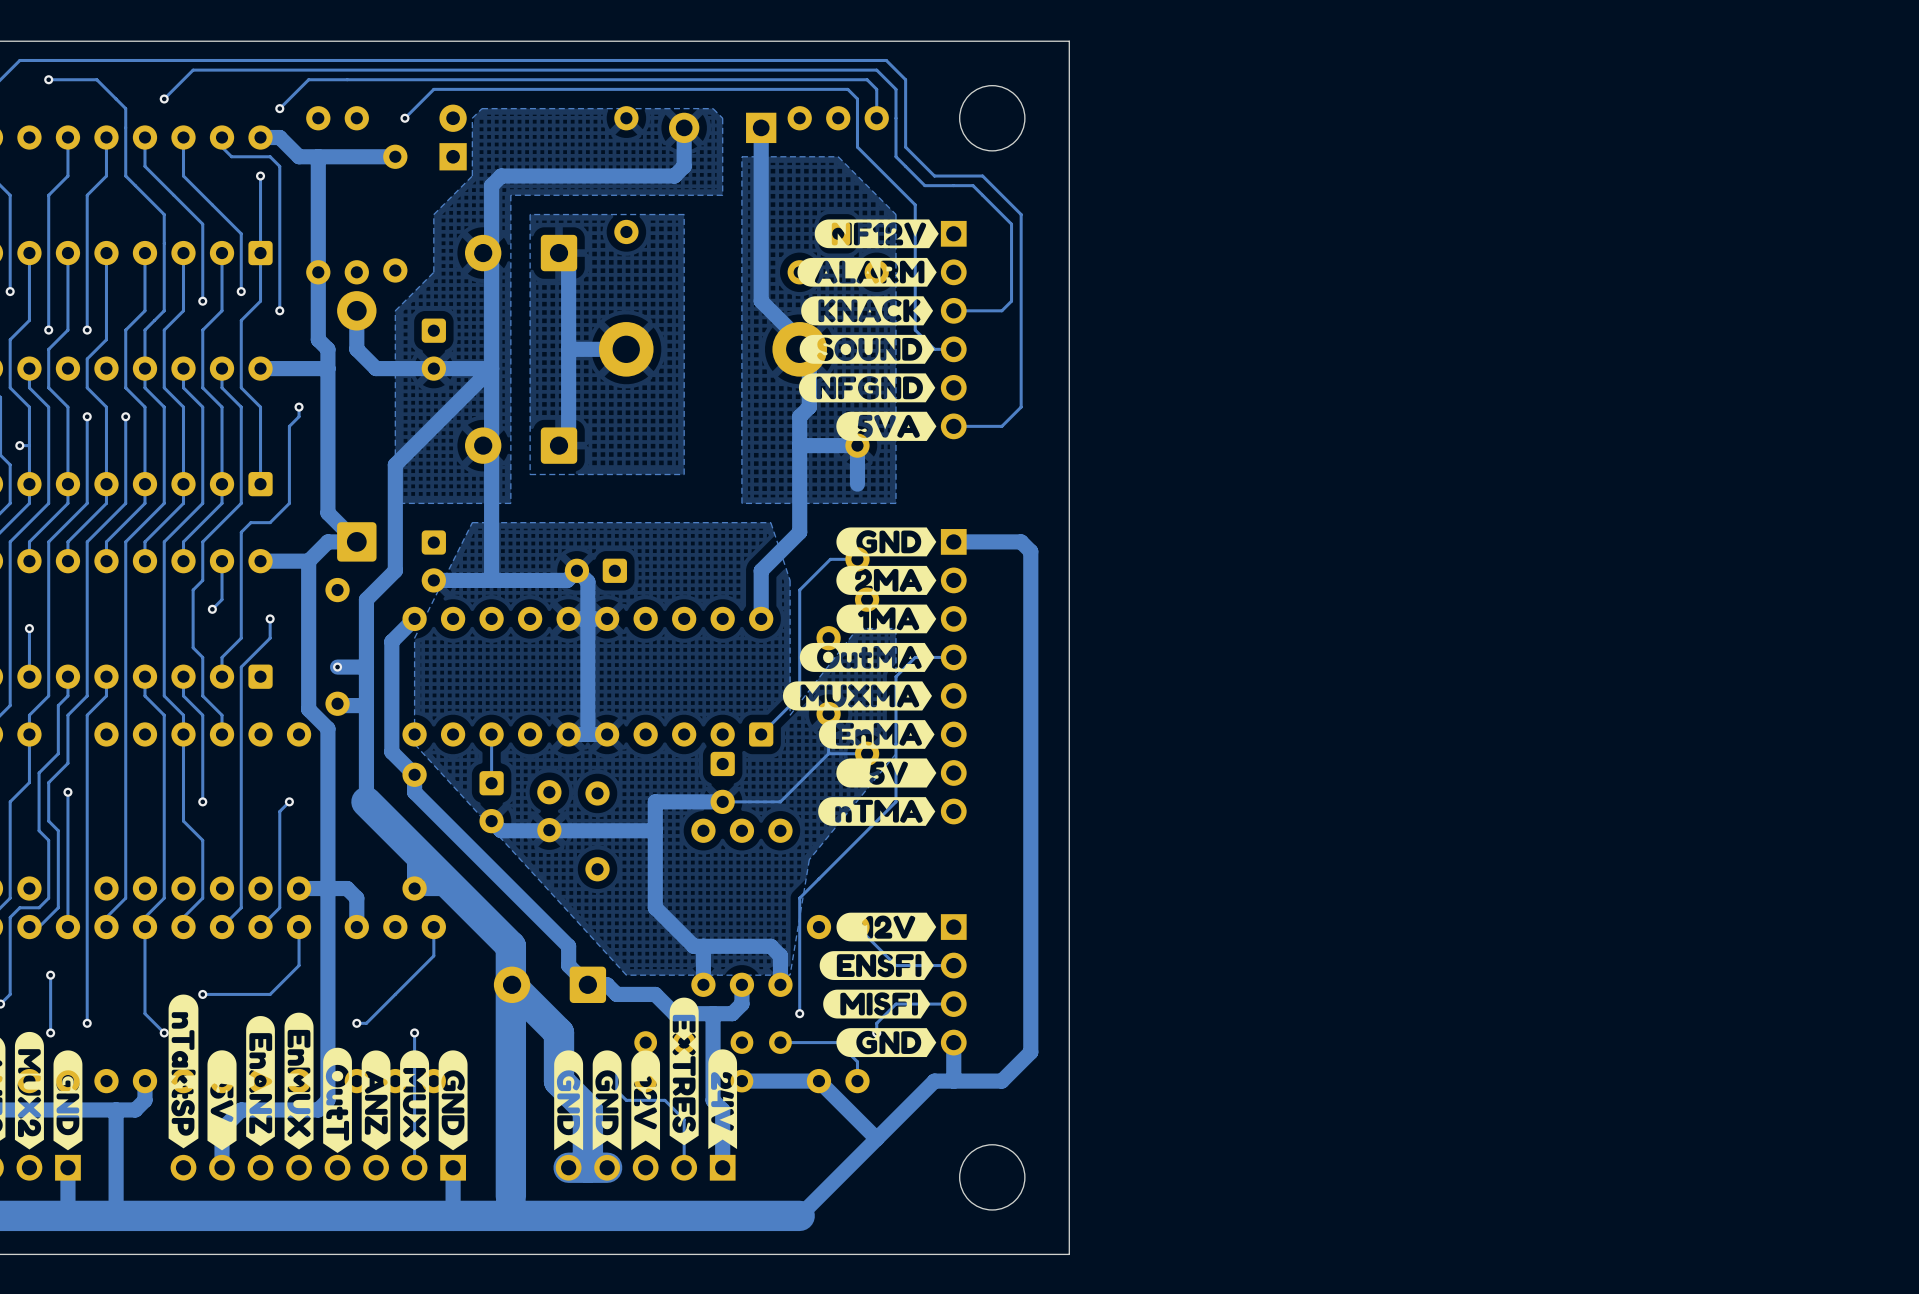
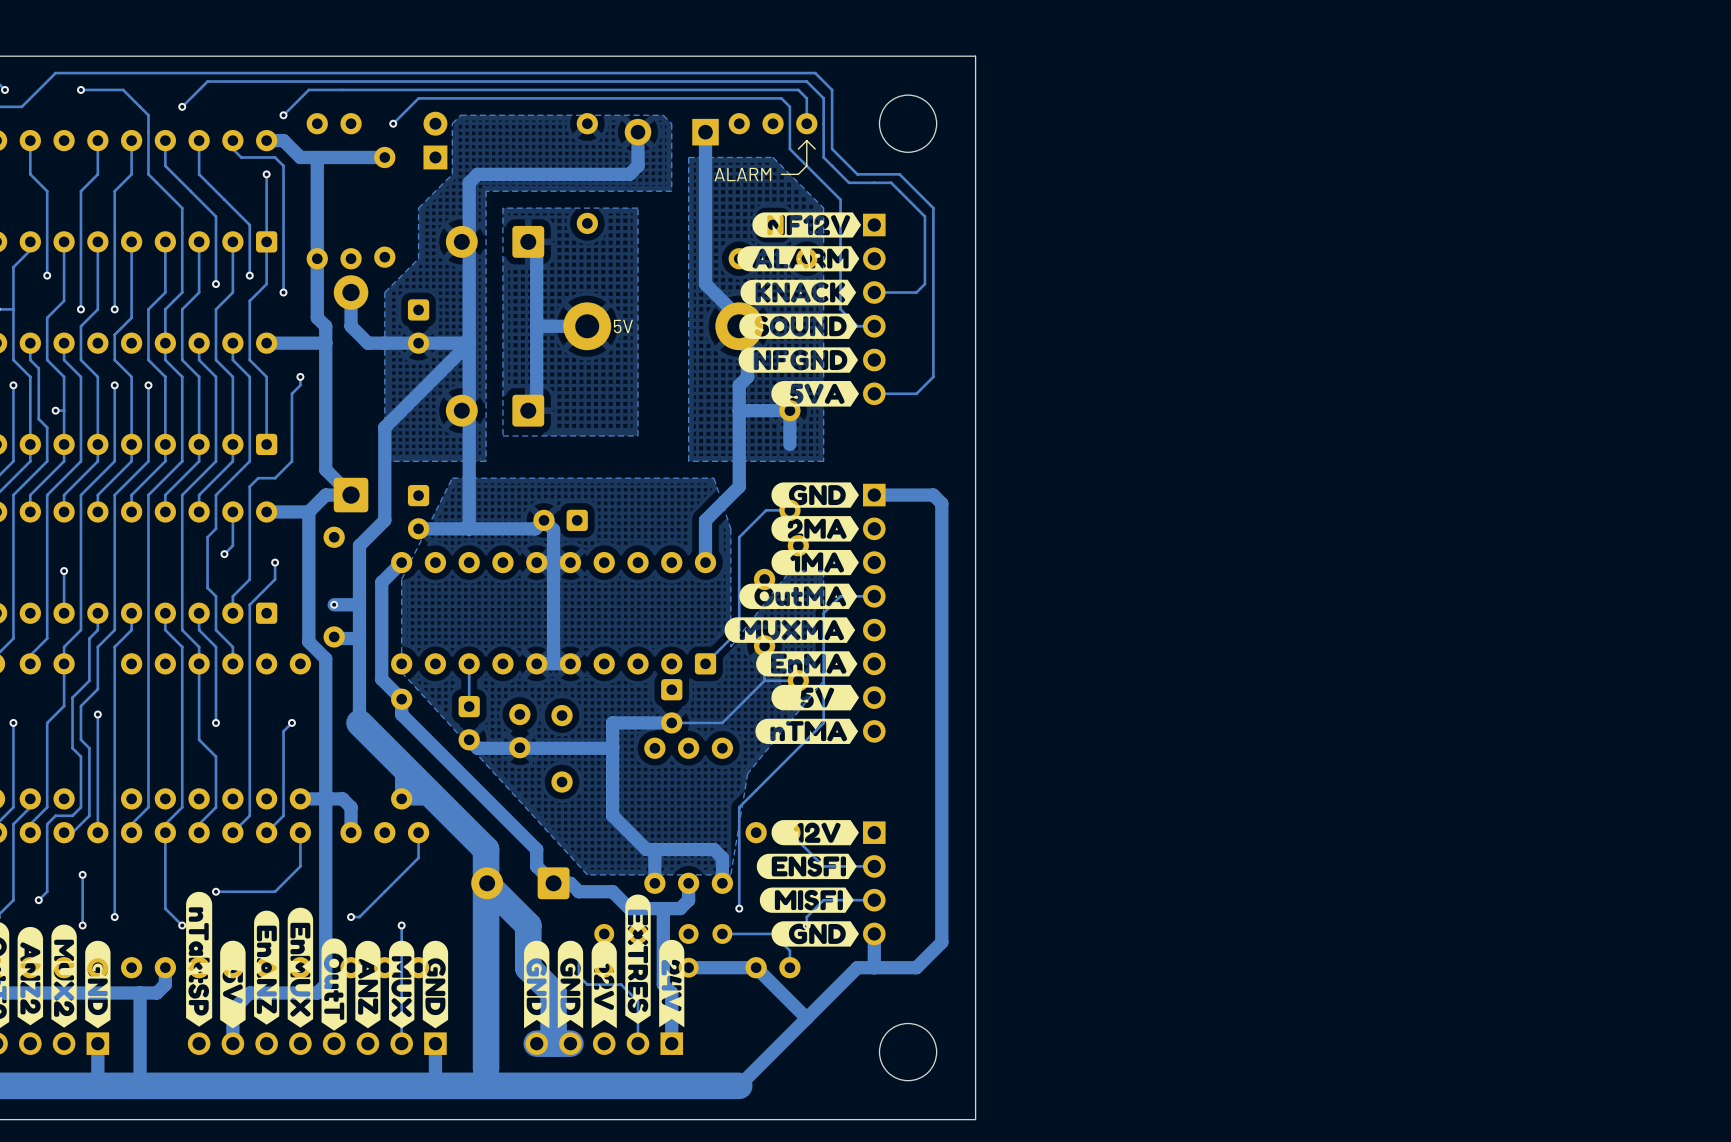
line: none -> (806, 140) (798, 149)
line: none -> (806, 140) (806, 165) (798, 174) (781, 174)
line: none -> (806, 140) (815, 149)
text: none -> ALARM (742, 174)
text: none -> 5V (623, 326)

